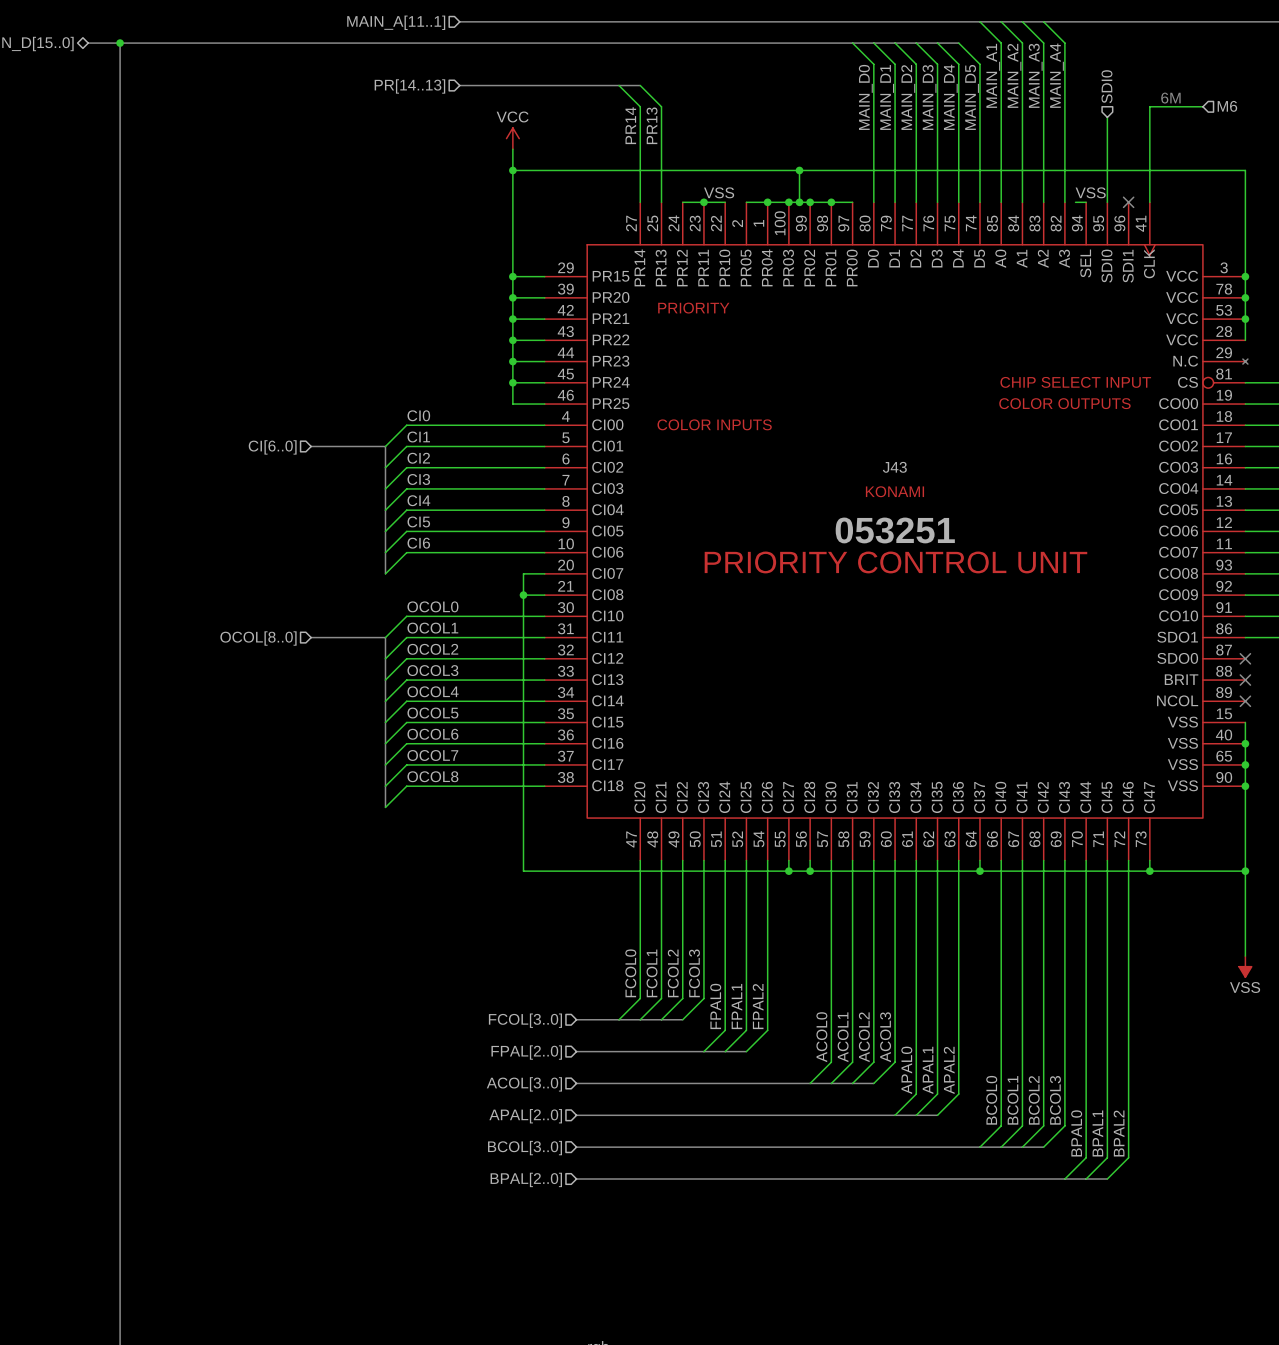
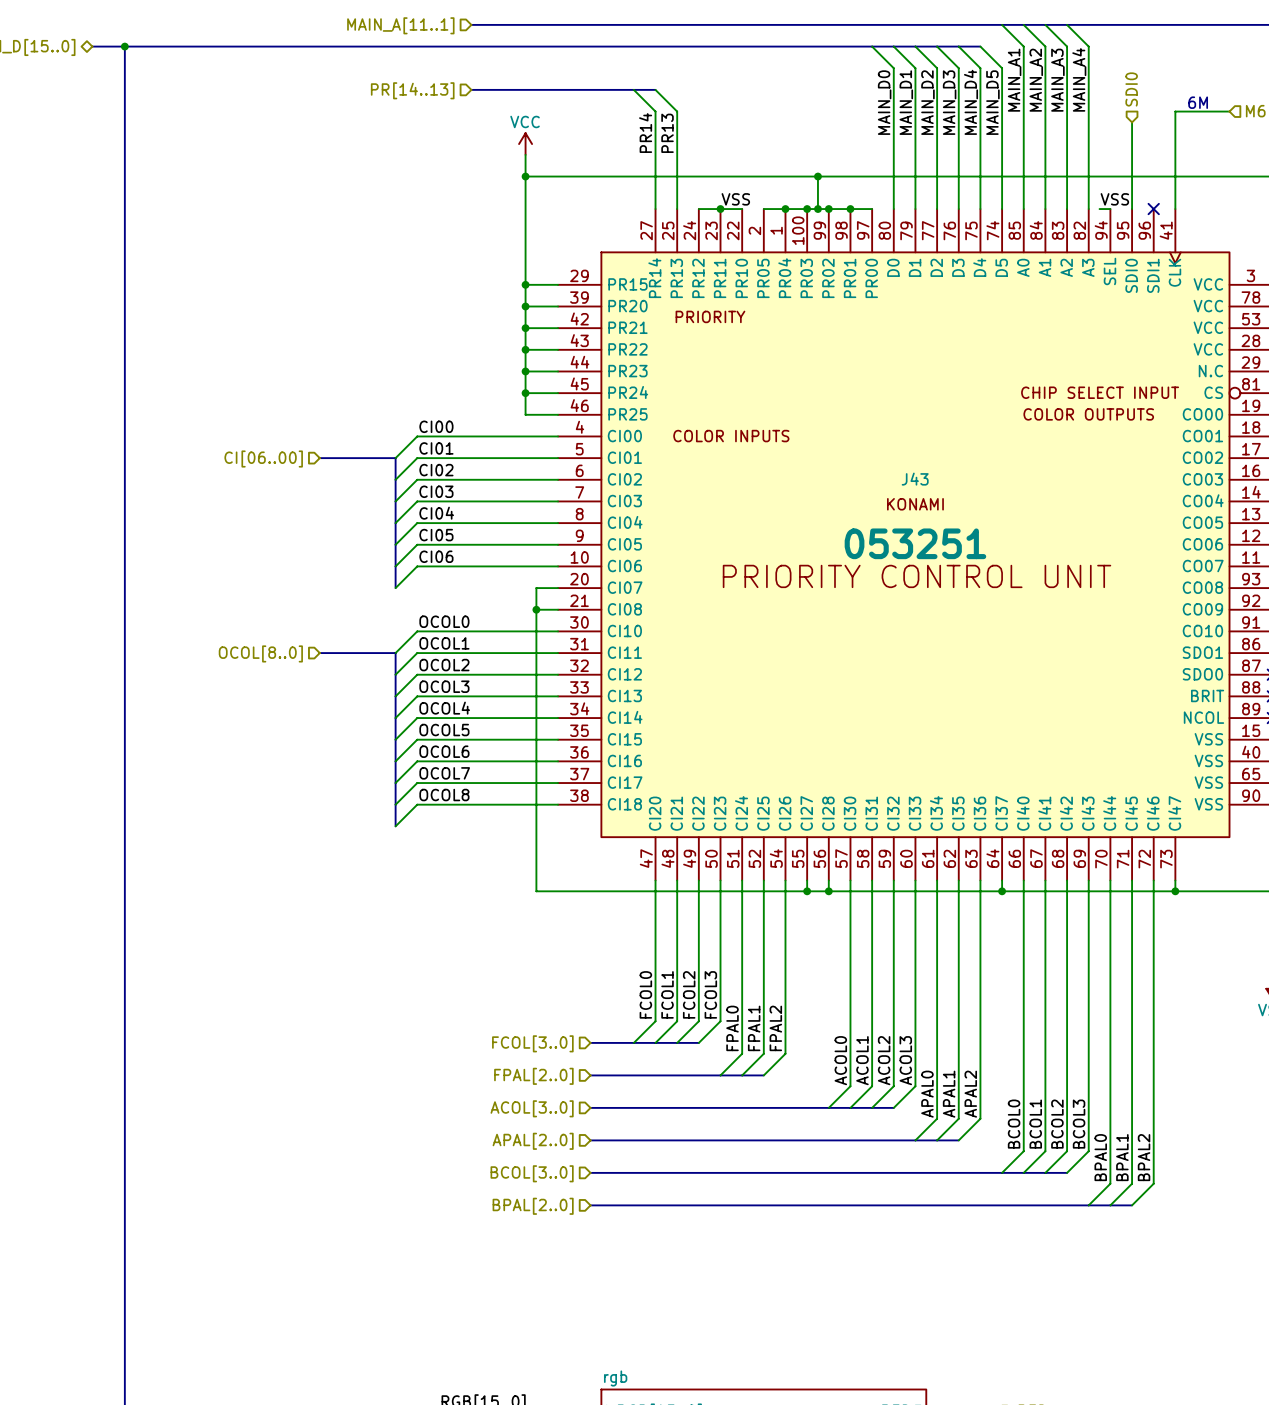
label: CI0 (418, 415) -> CI00 (436, 426)
label: CI1 (418, 437) -> CI01 (436, 448)
hierarchical label: CI[6..0] (272, 447) -> CI[06..00] (263, 459)
label: CI2 (418, 458) -> CI02 (436, 470)
label: CI3 (418, 479) -> CI03 (436, 491)
label: CI4 (418, 500) -> CI04 (436, 513)
label: CI5 (418, 521) -> CI05 (436, 535)
label: CI6 (418, 543) -> CI06 (436, 556)

